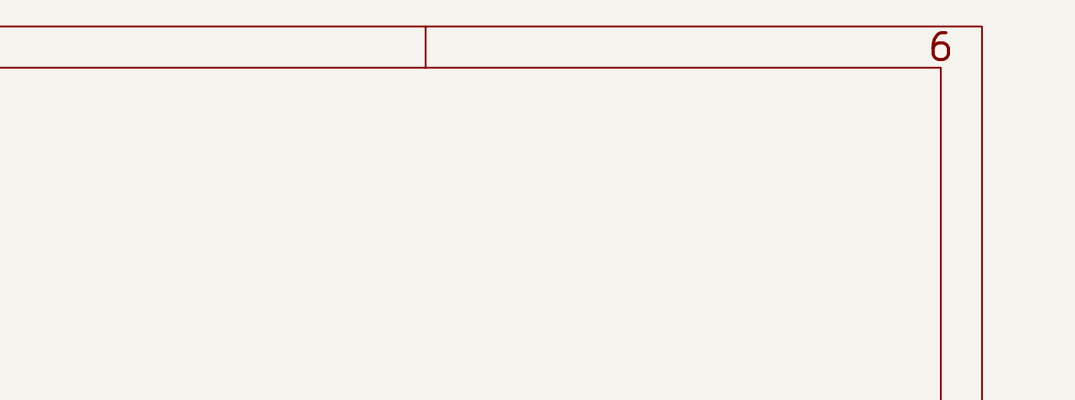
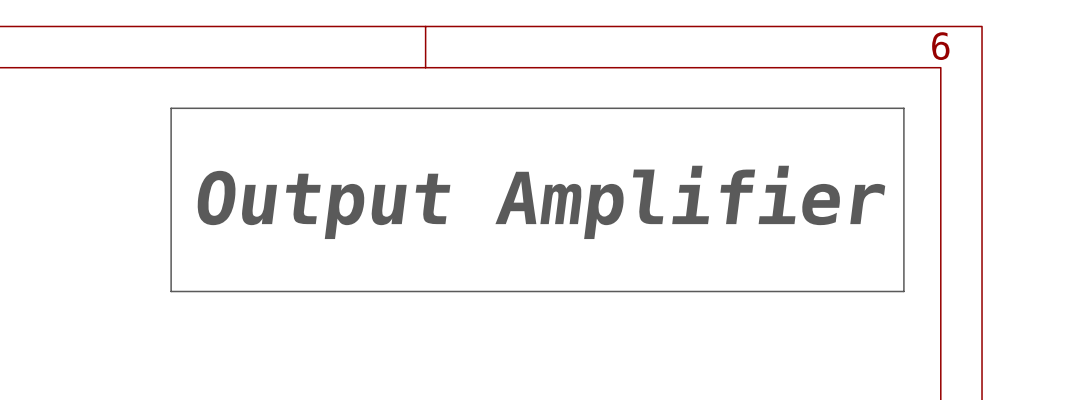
line: none -> (171, 108) (903, 108) (903, 291) (171, 291) (171, 108)
text: none -> Output Amplifier (540, 202)

